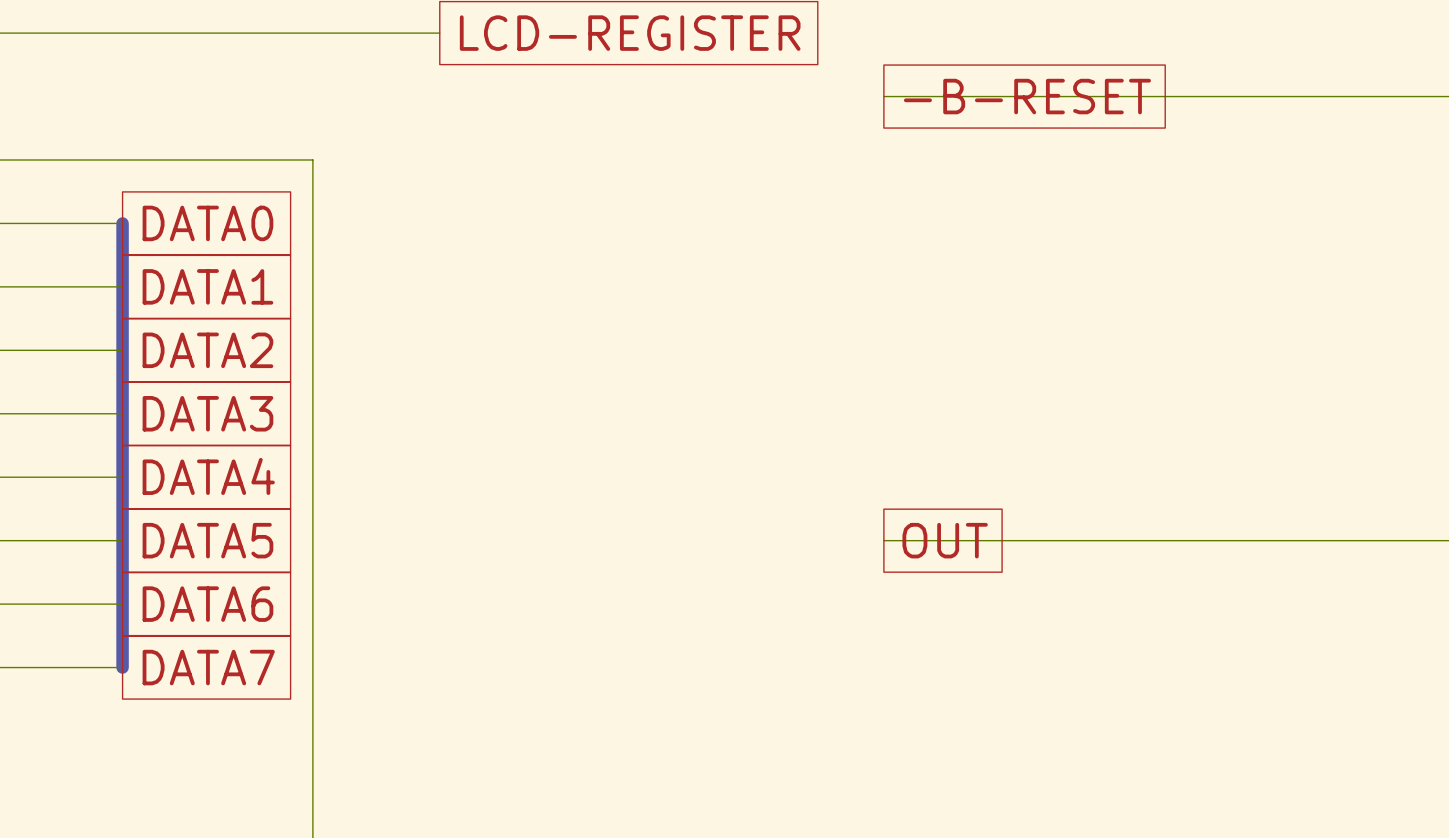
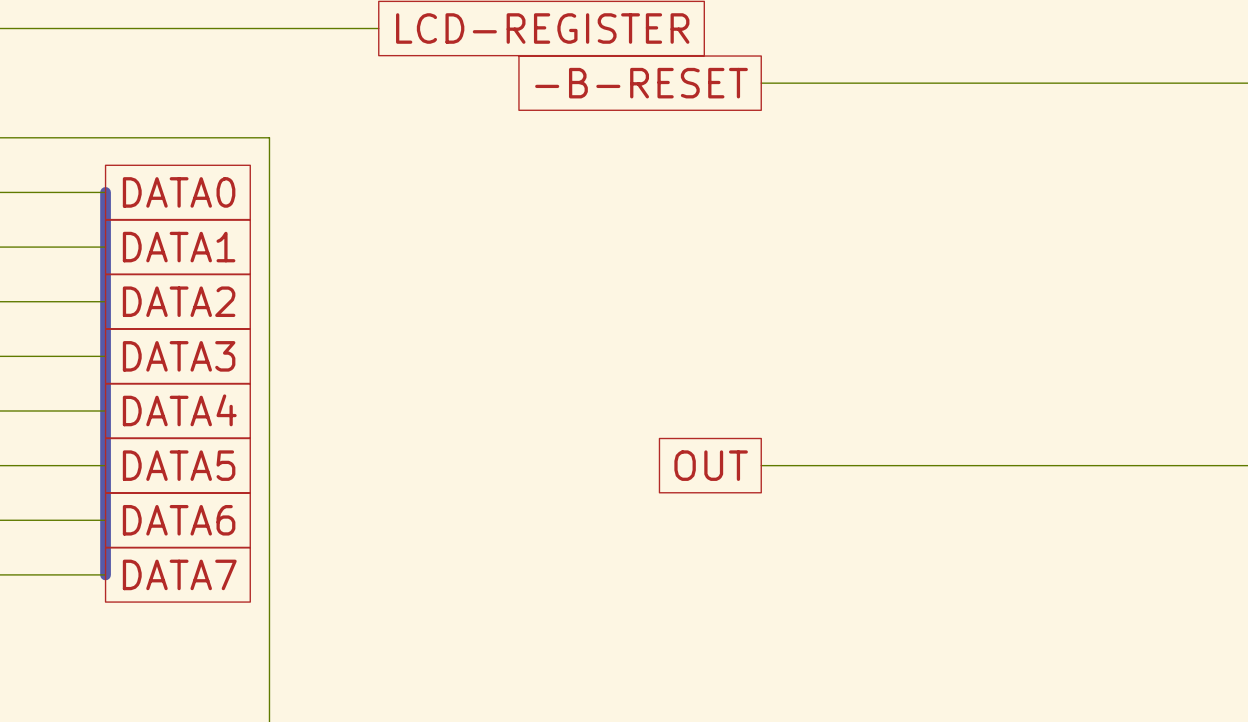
global label rotation: 0° (1027, 96) -> 180° (641, 83)
global label rotation: 0° (945, 540) -> 180° (711, 465)

